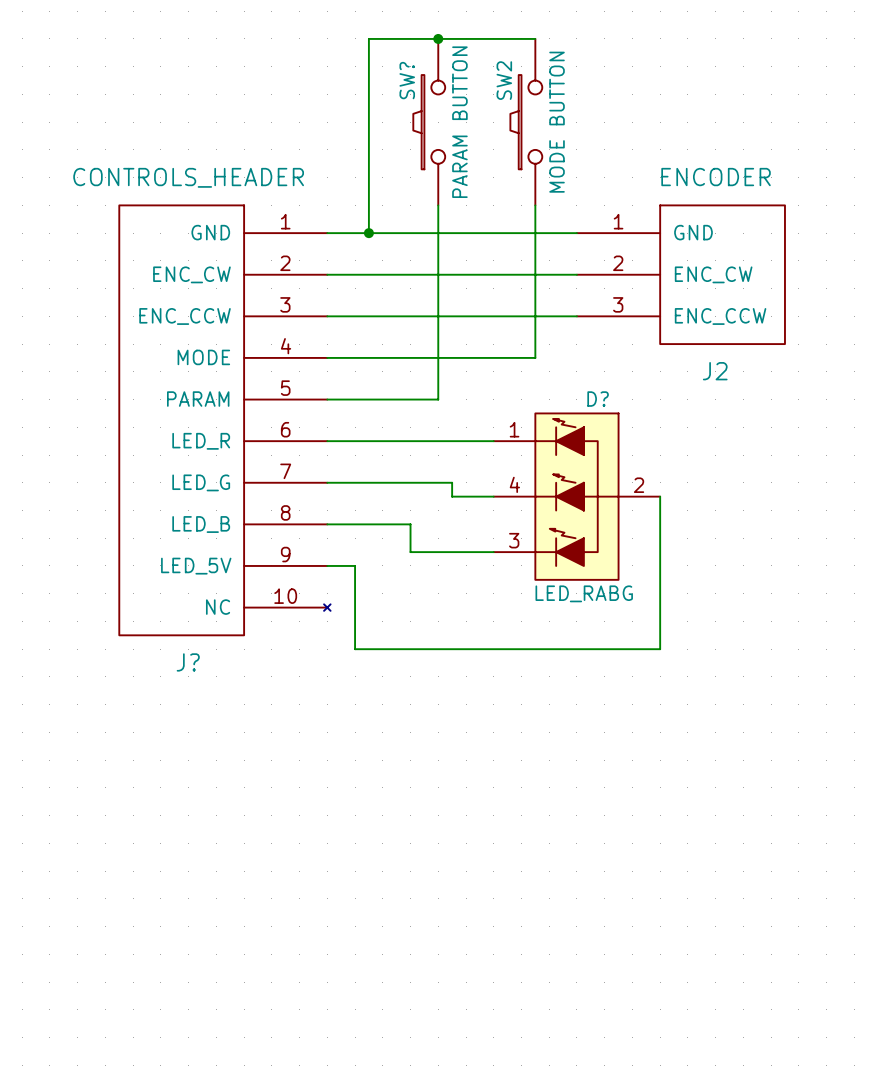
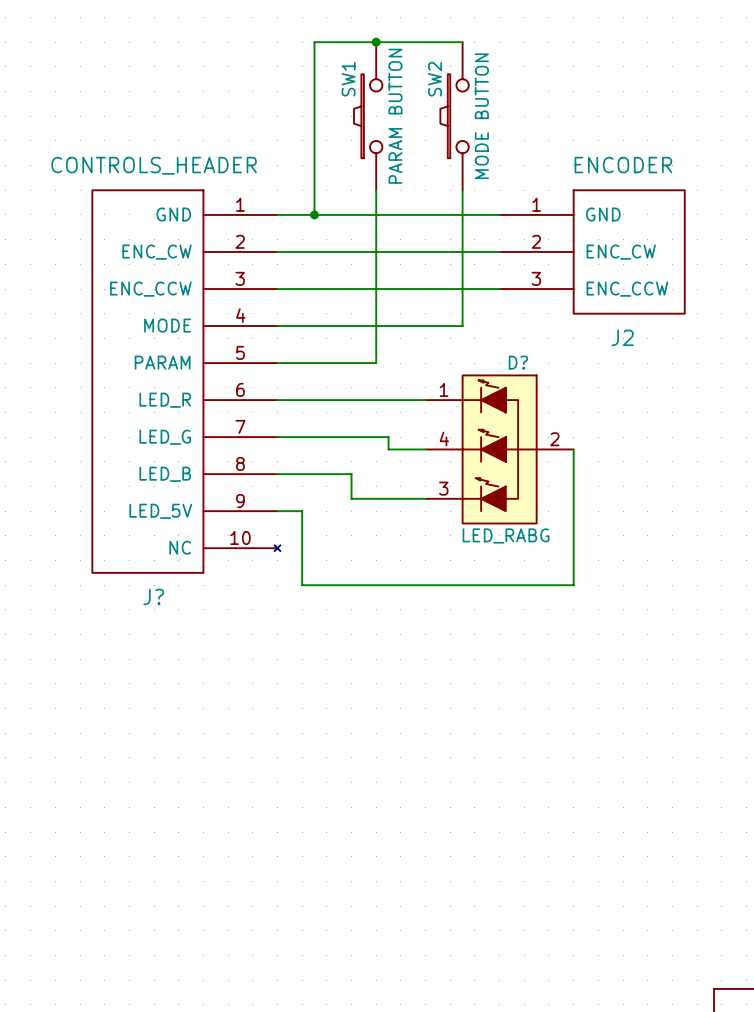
SW? name: SW? (407, 80) -> SW1 (348, 79)

